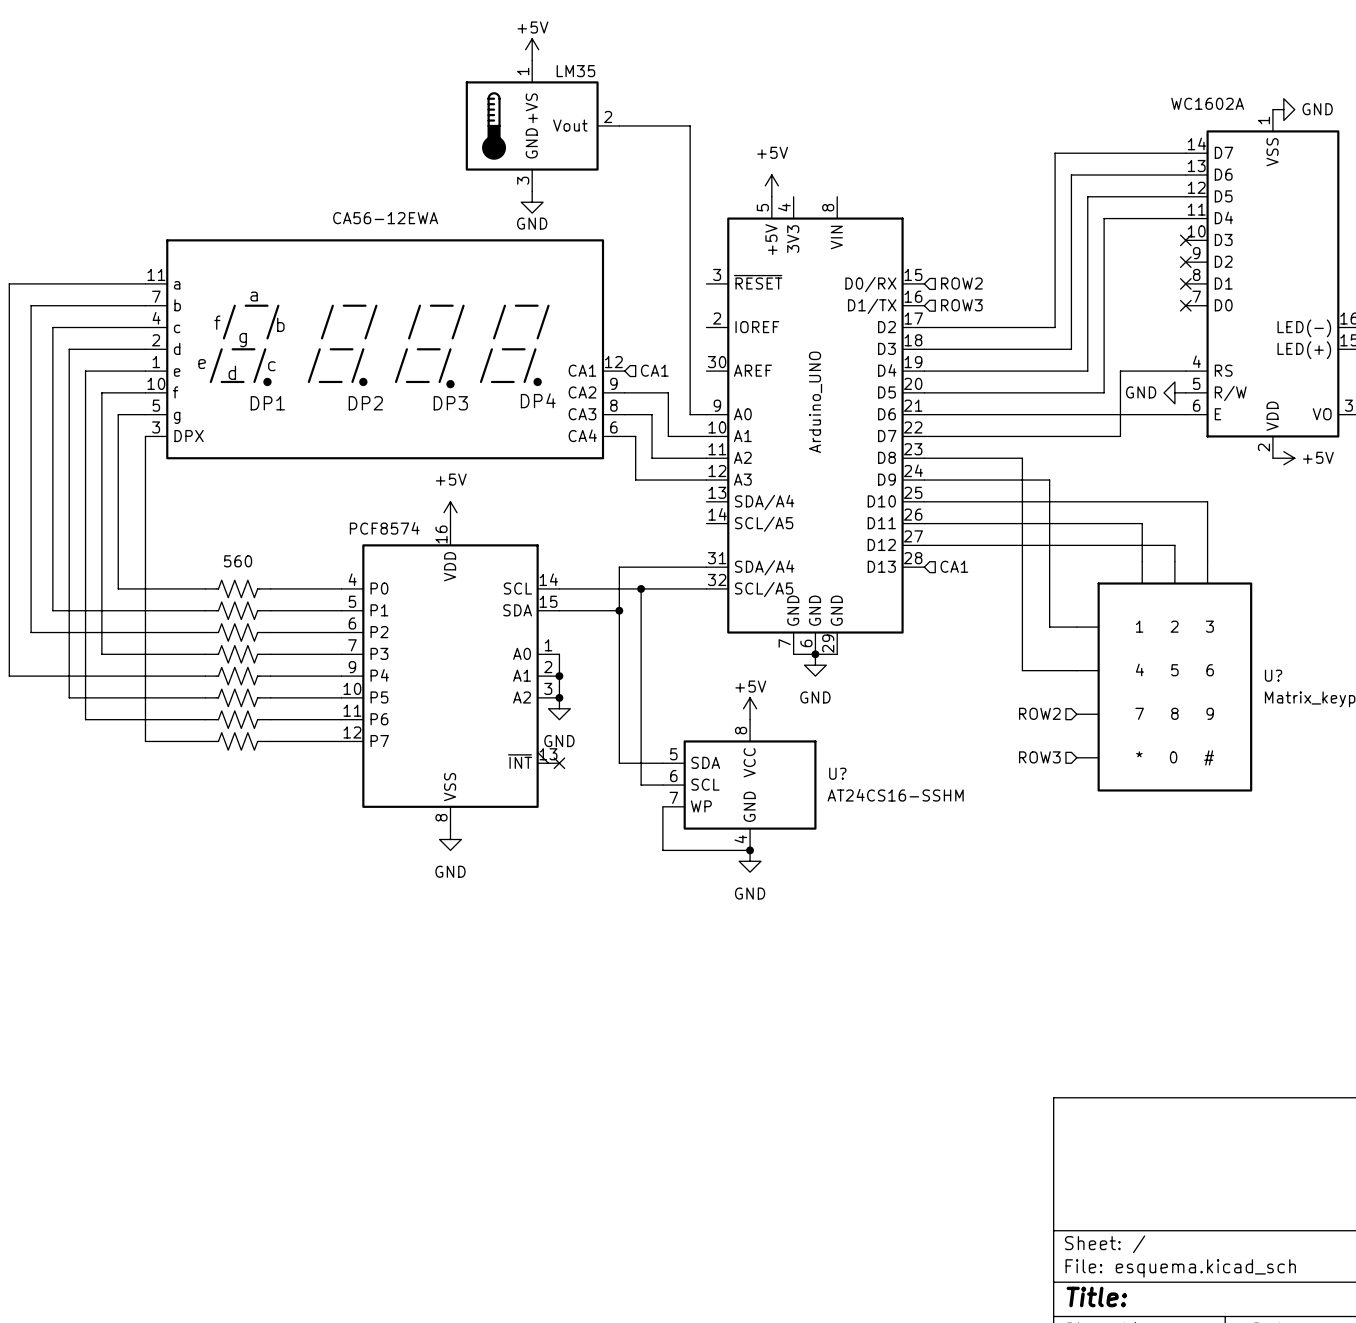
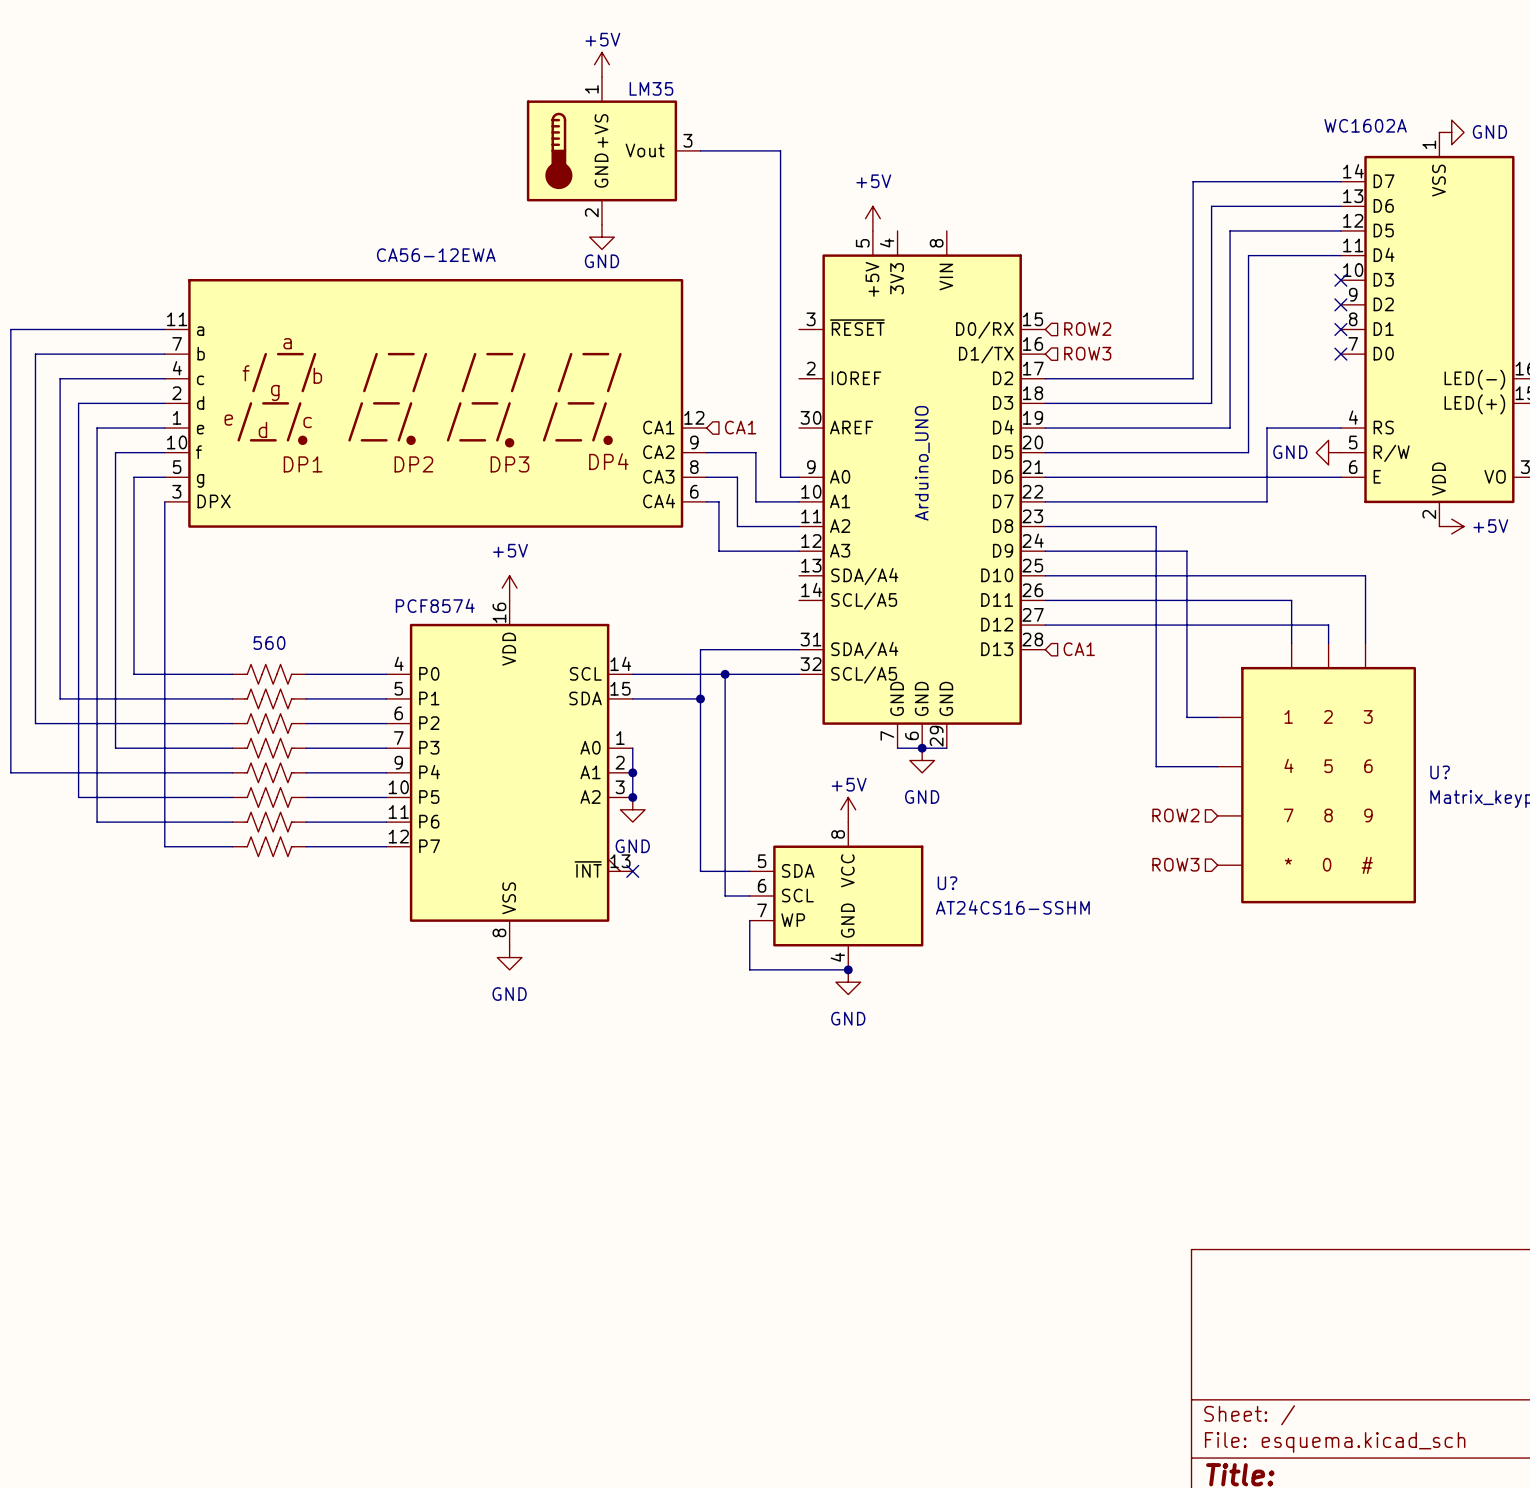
part pin number: 2 (608, 116) -> 3 (687, 140)
part pin number: 3 (523, 180) -> 2 (591, 212)

